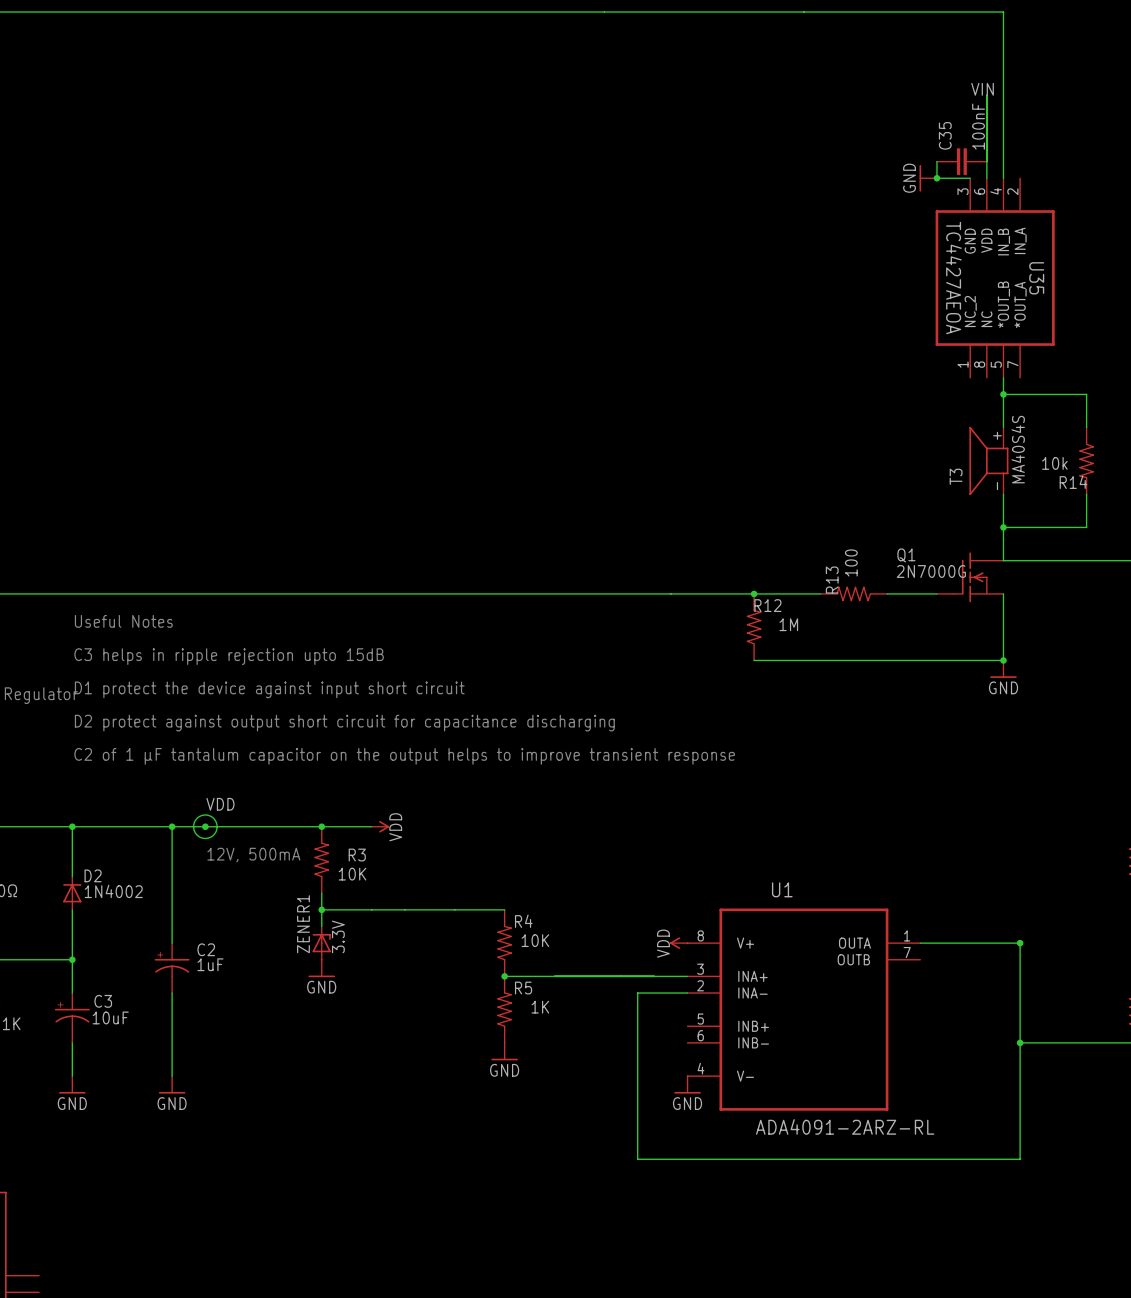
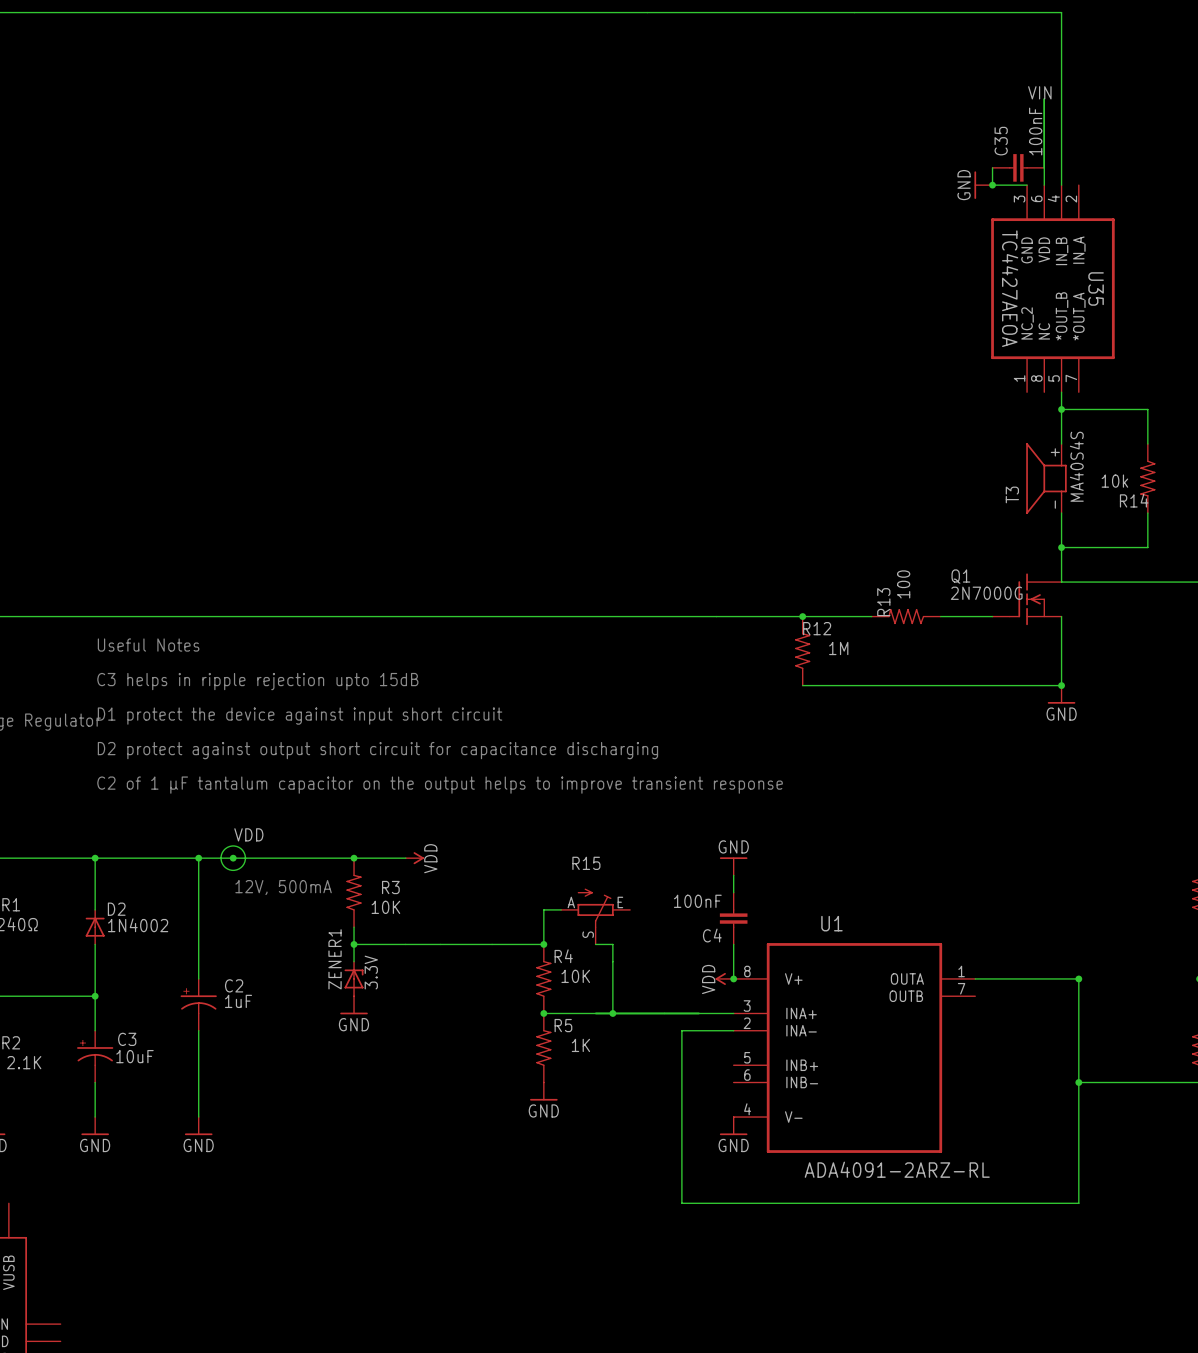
power symbol: none -> GND (733, 866)
wire: none -> (733, 875) (733, 892)
wire: none -> (561, 909) (543, 909) (543, 944)
R15: none -> (595, 916)
C4: none -> 100nF (733, 918)
junction: none -> (543, 944)
wire: none -> (595, 944) (612, 944) (612, 1013)
wire: none -> (733, 944) (733, 978)
junction: none -> (733, 978)
junction: none -> (612, 1013)

